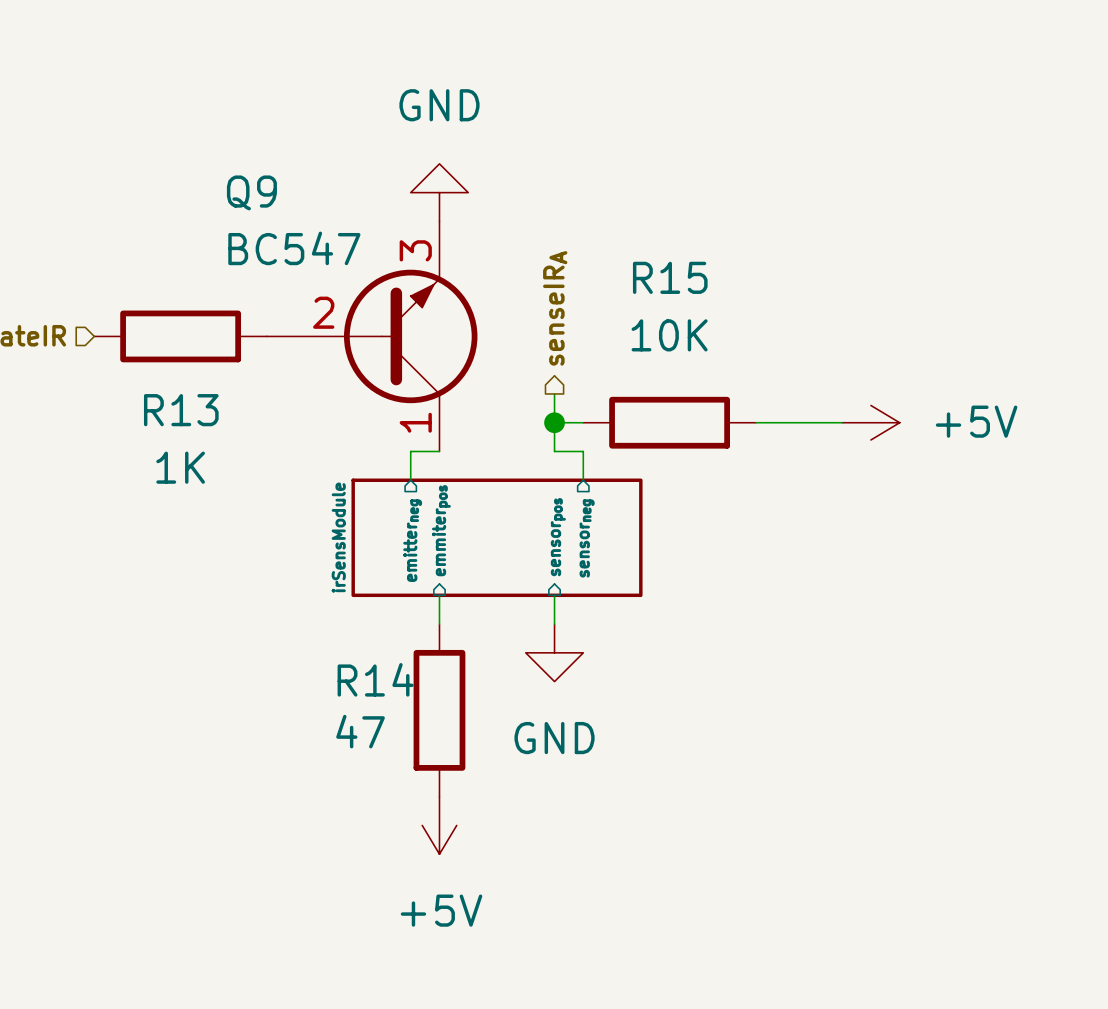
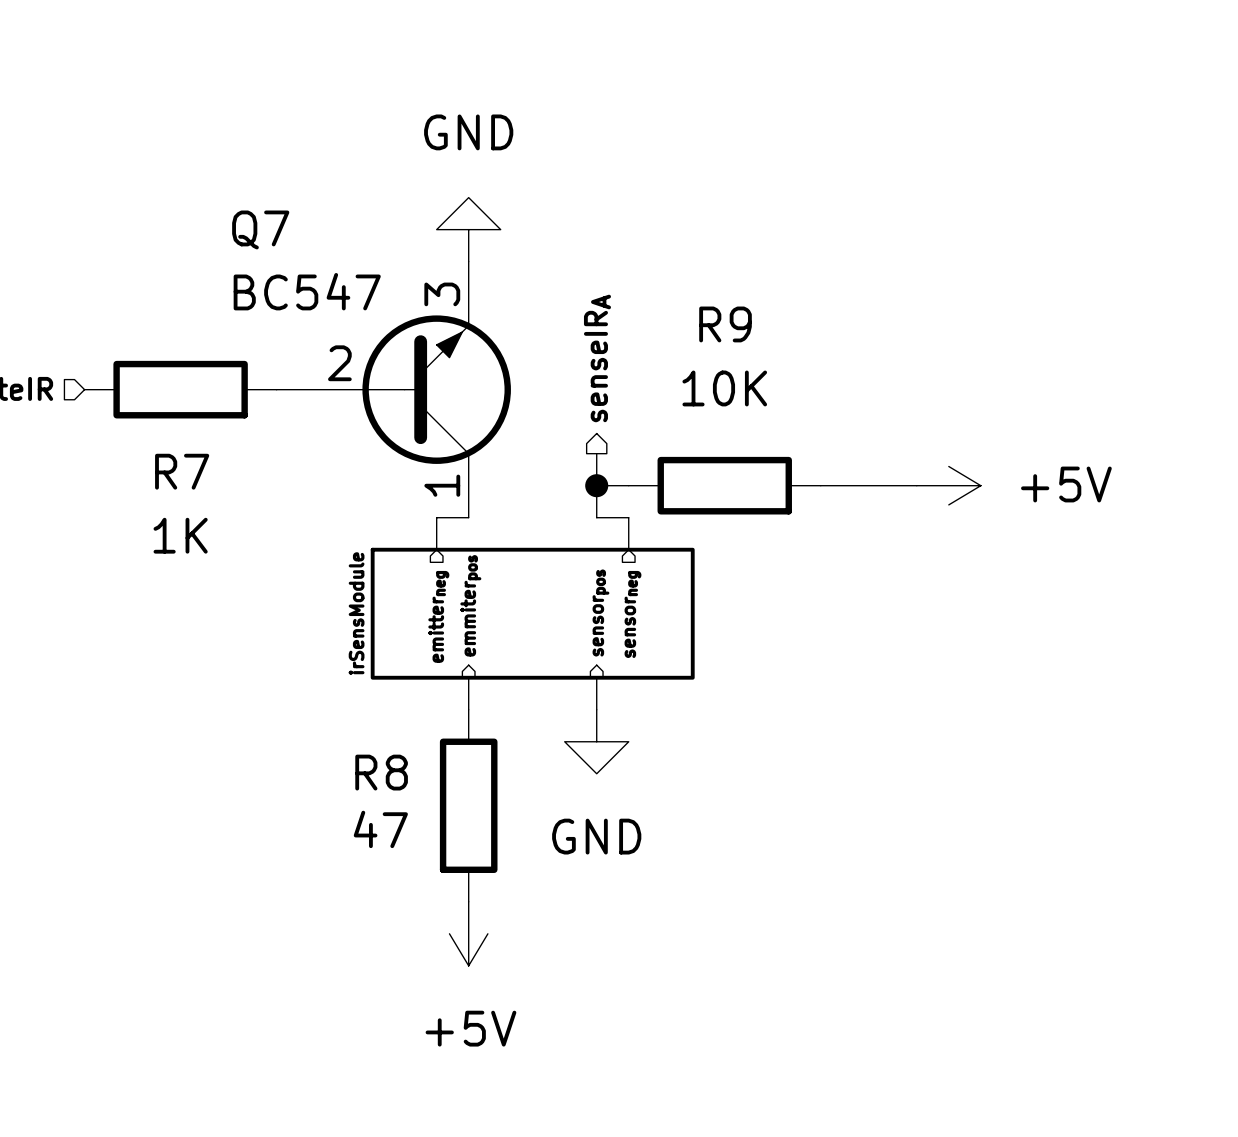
Q9 name: Q9 (251, 192) -> Q7 (260, 229)
R15 name: R15 (670, 277) -> R9 (725, 324)
R13 name: R13 (181, 410) -> R7 (182, 471)
R14 name: R14 (375, 679) -> R8 (381, 772)

